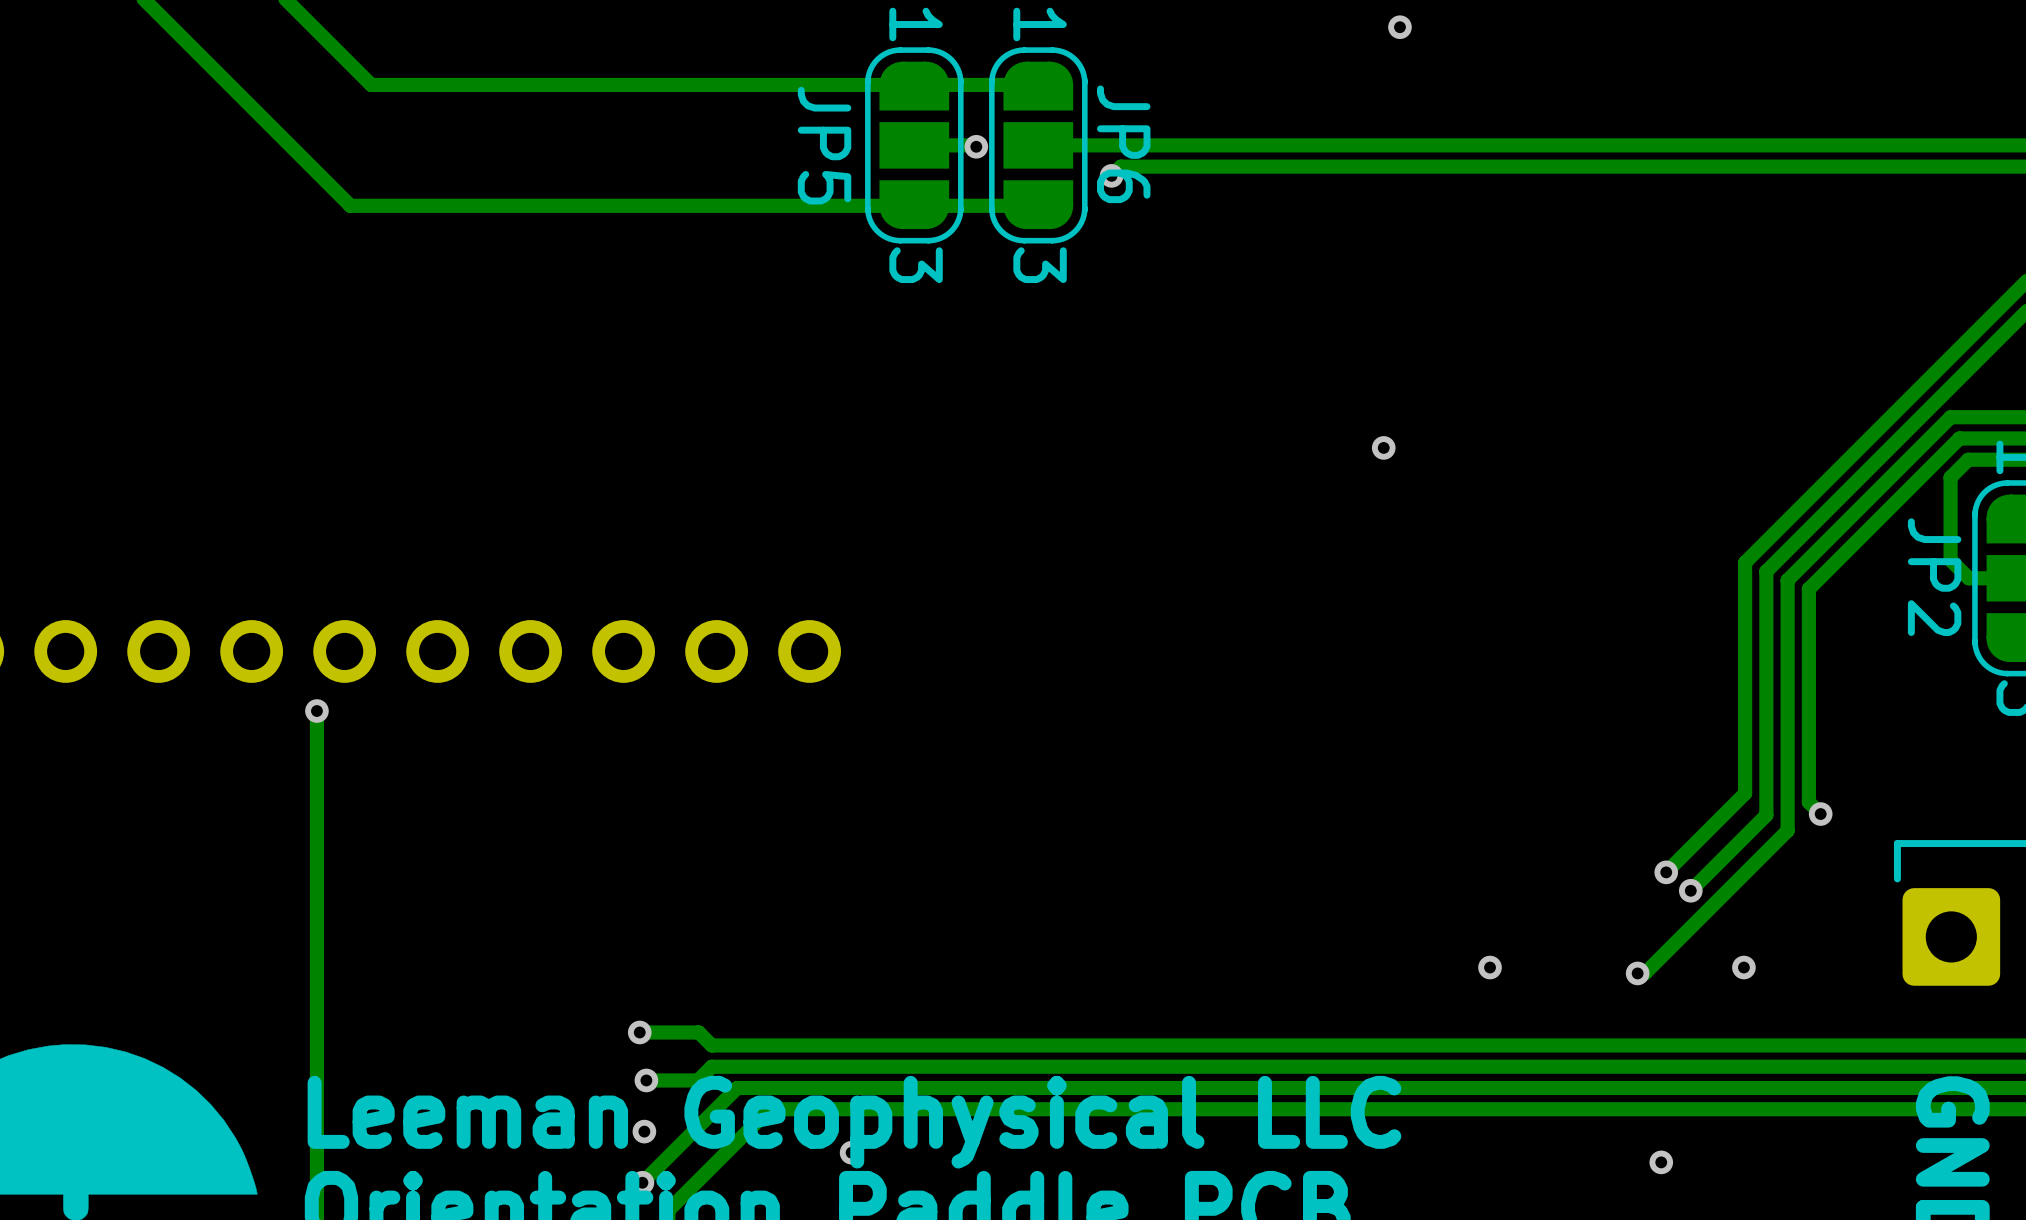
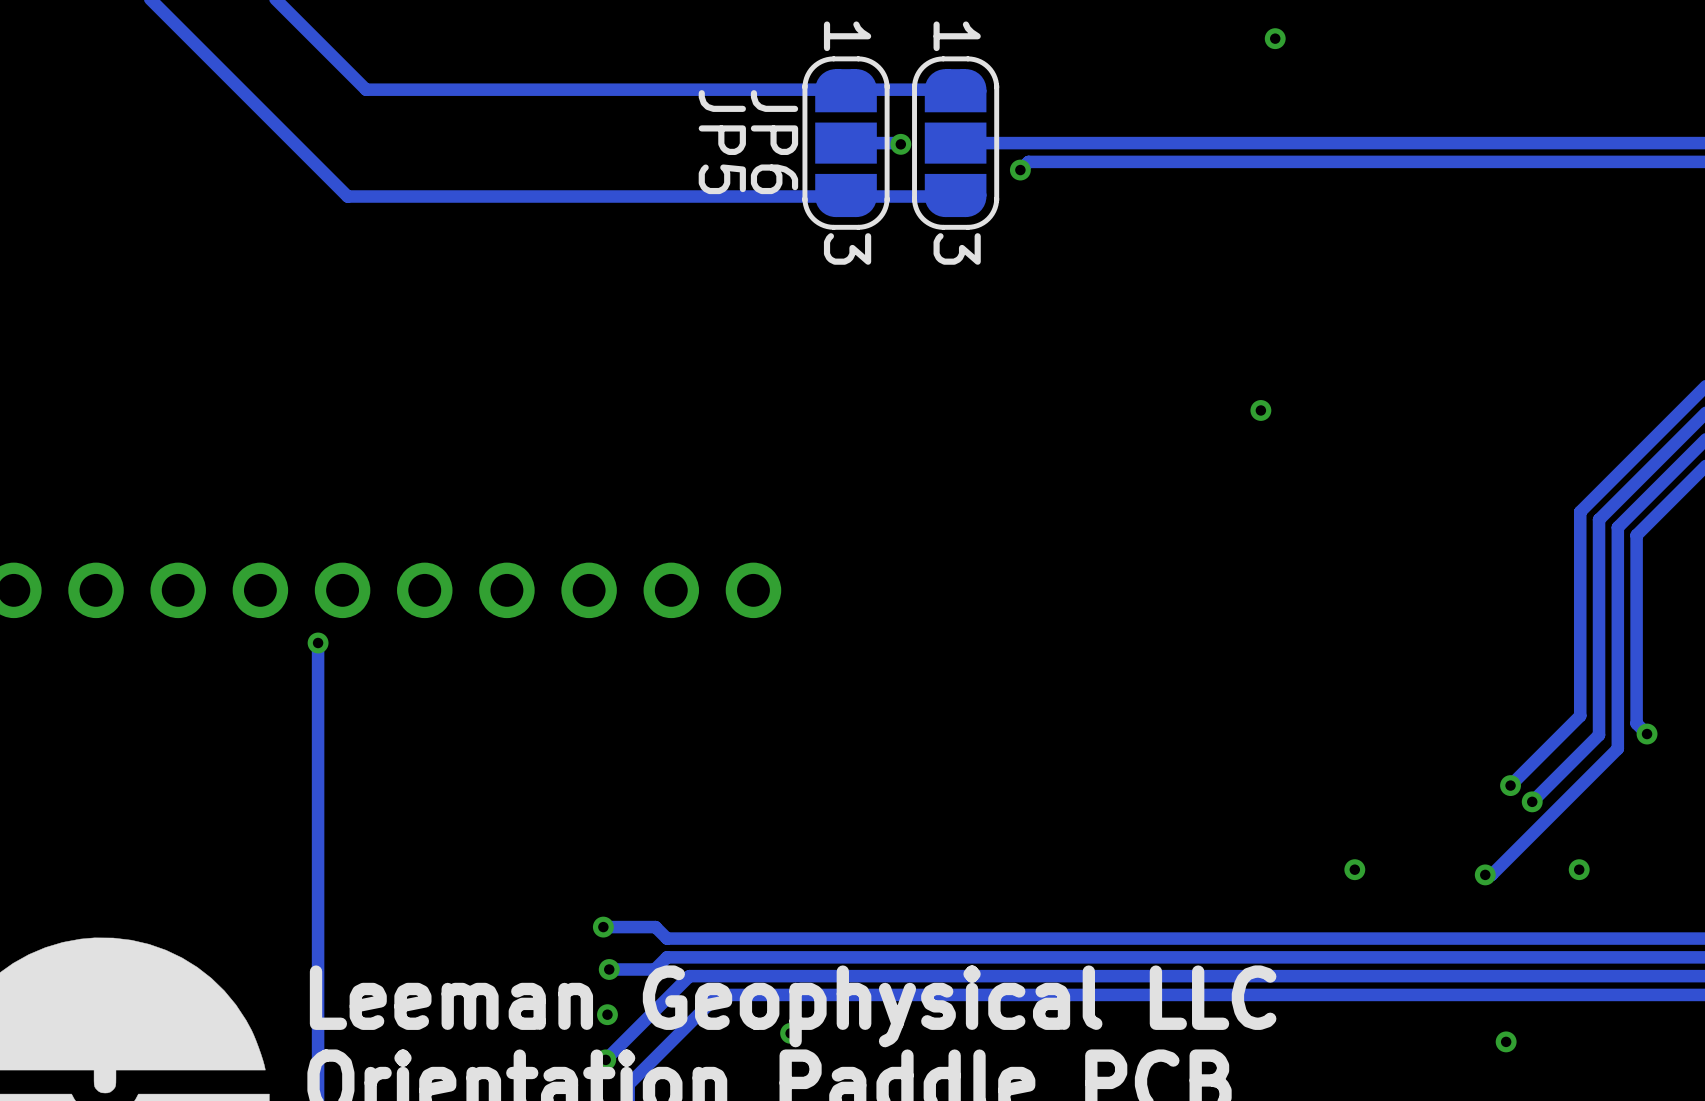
JP6 name position: JP6 (1123, 144) -> JP6 (774, 142)
JP5 name position: JP5 (824, 145) -> JP5 (722, 142)

